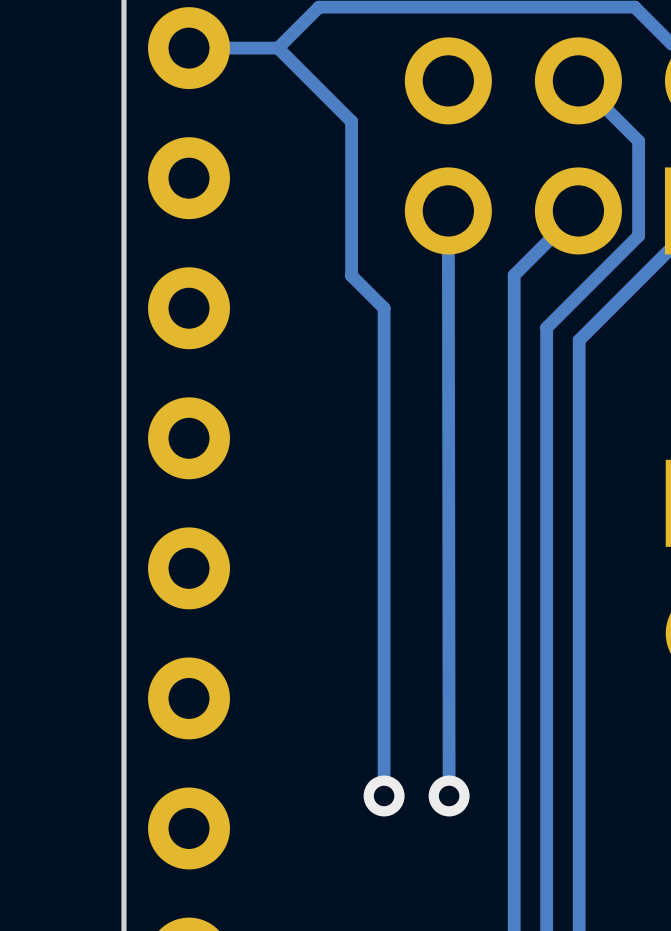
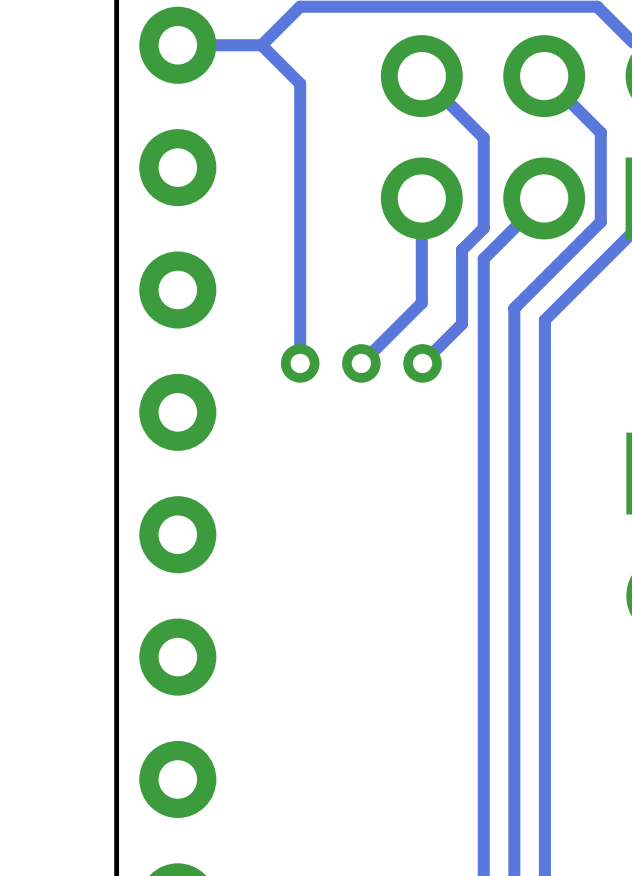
track: none -> (421, 76) (483, 138) (483, 228) (462, 249) (462, 323) (422, 363)
track: (319, 89) (351, 121) (351, 275) (384, 308) (384, 795) -> (300, 83) (300, 363)
track: (448, 210) (448, 795) -> (421, 198) (421, 302) (361, 363)
via: none -> (300, 363)
via: none -> (361, 363)
via: none -> (422, 363)
via: (384, 795) -> none
via: (449, 795) -> none

